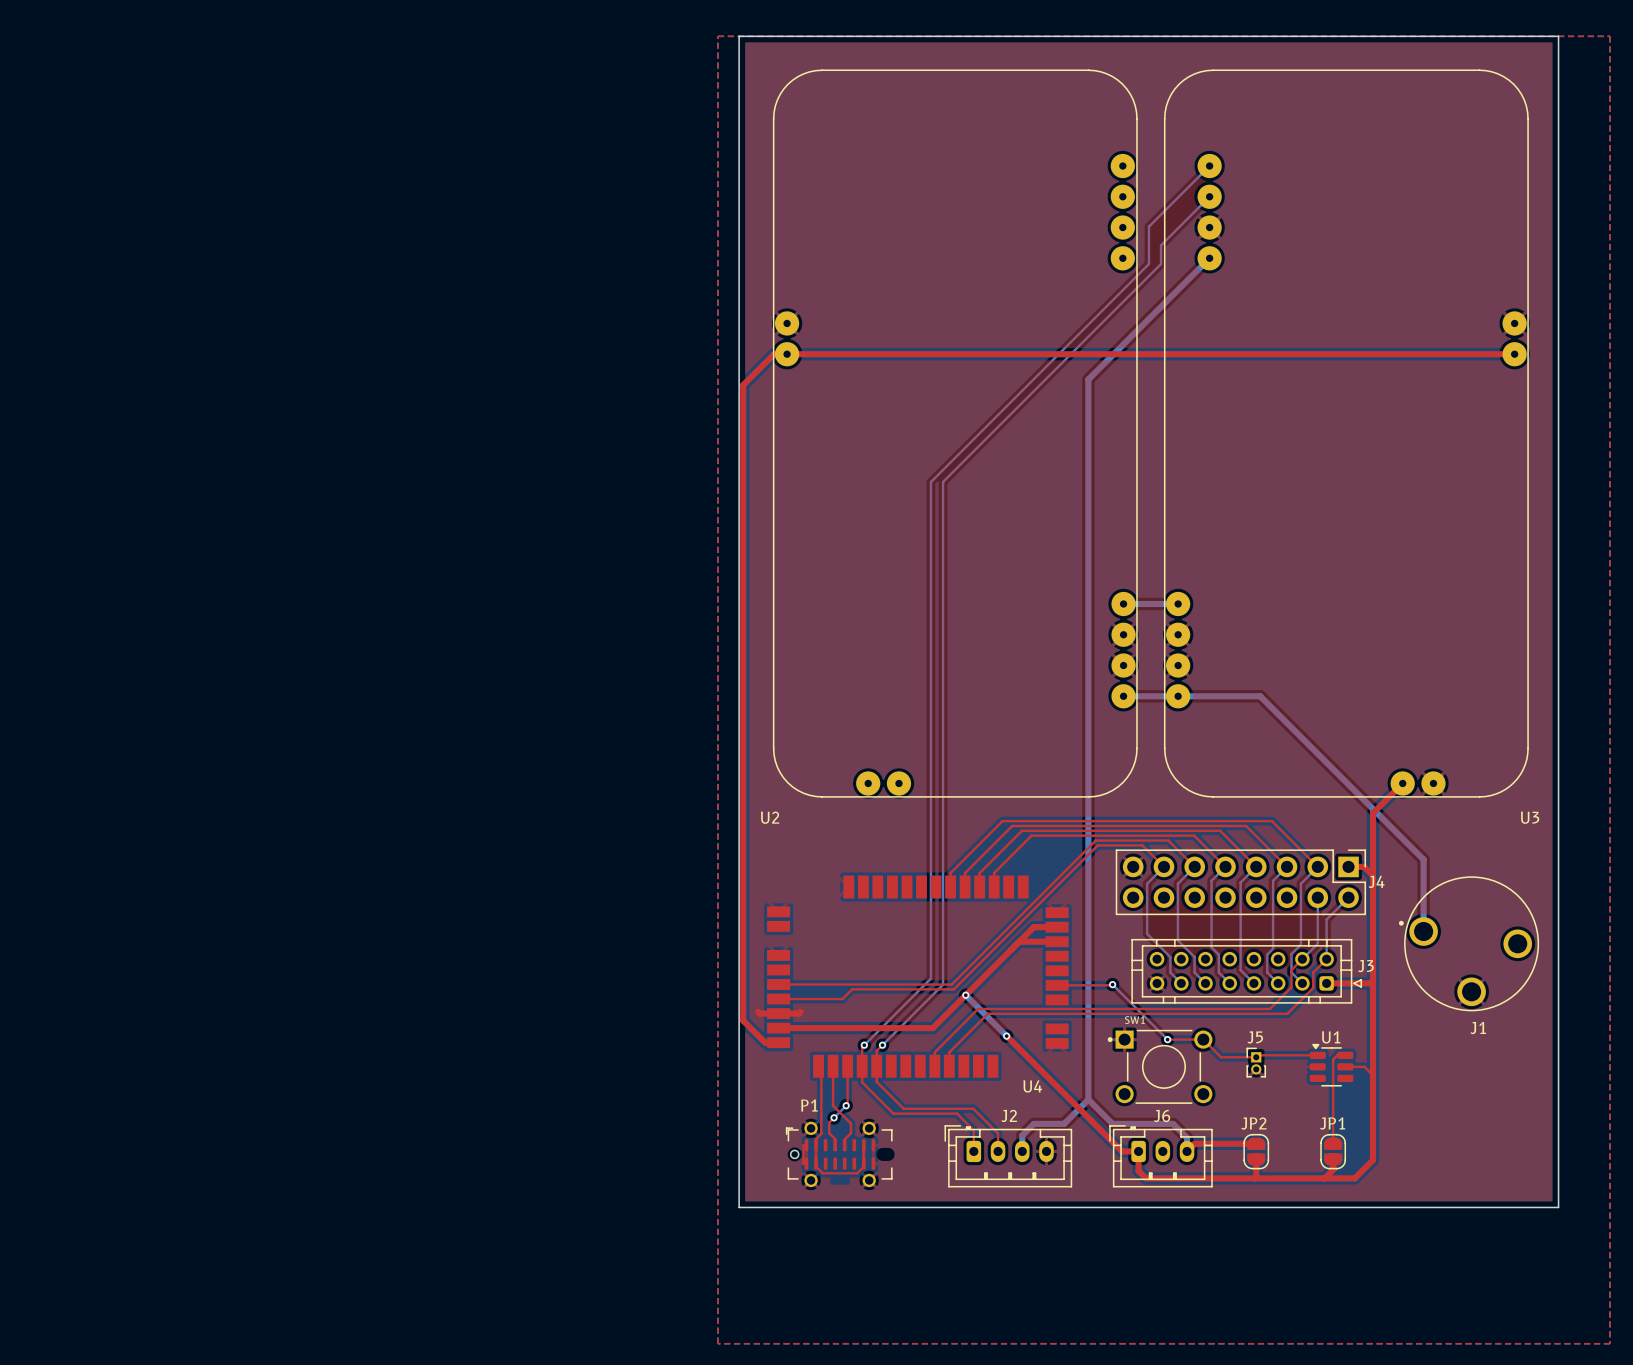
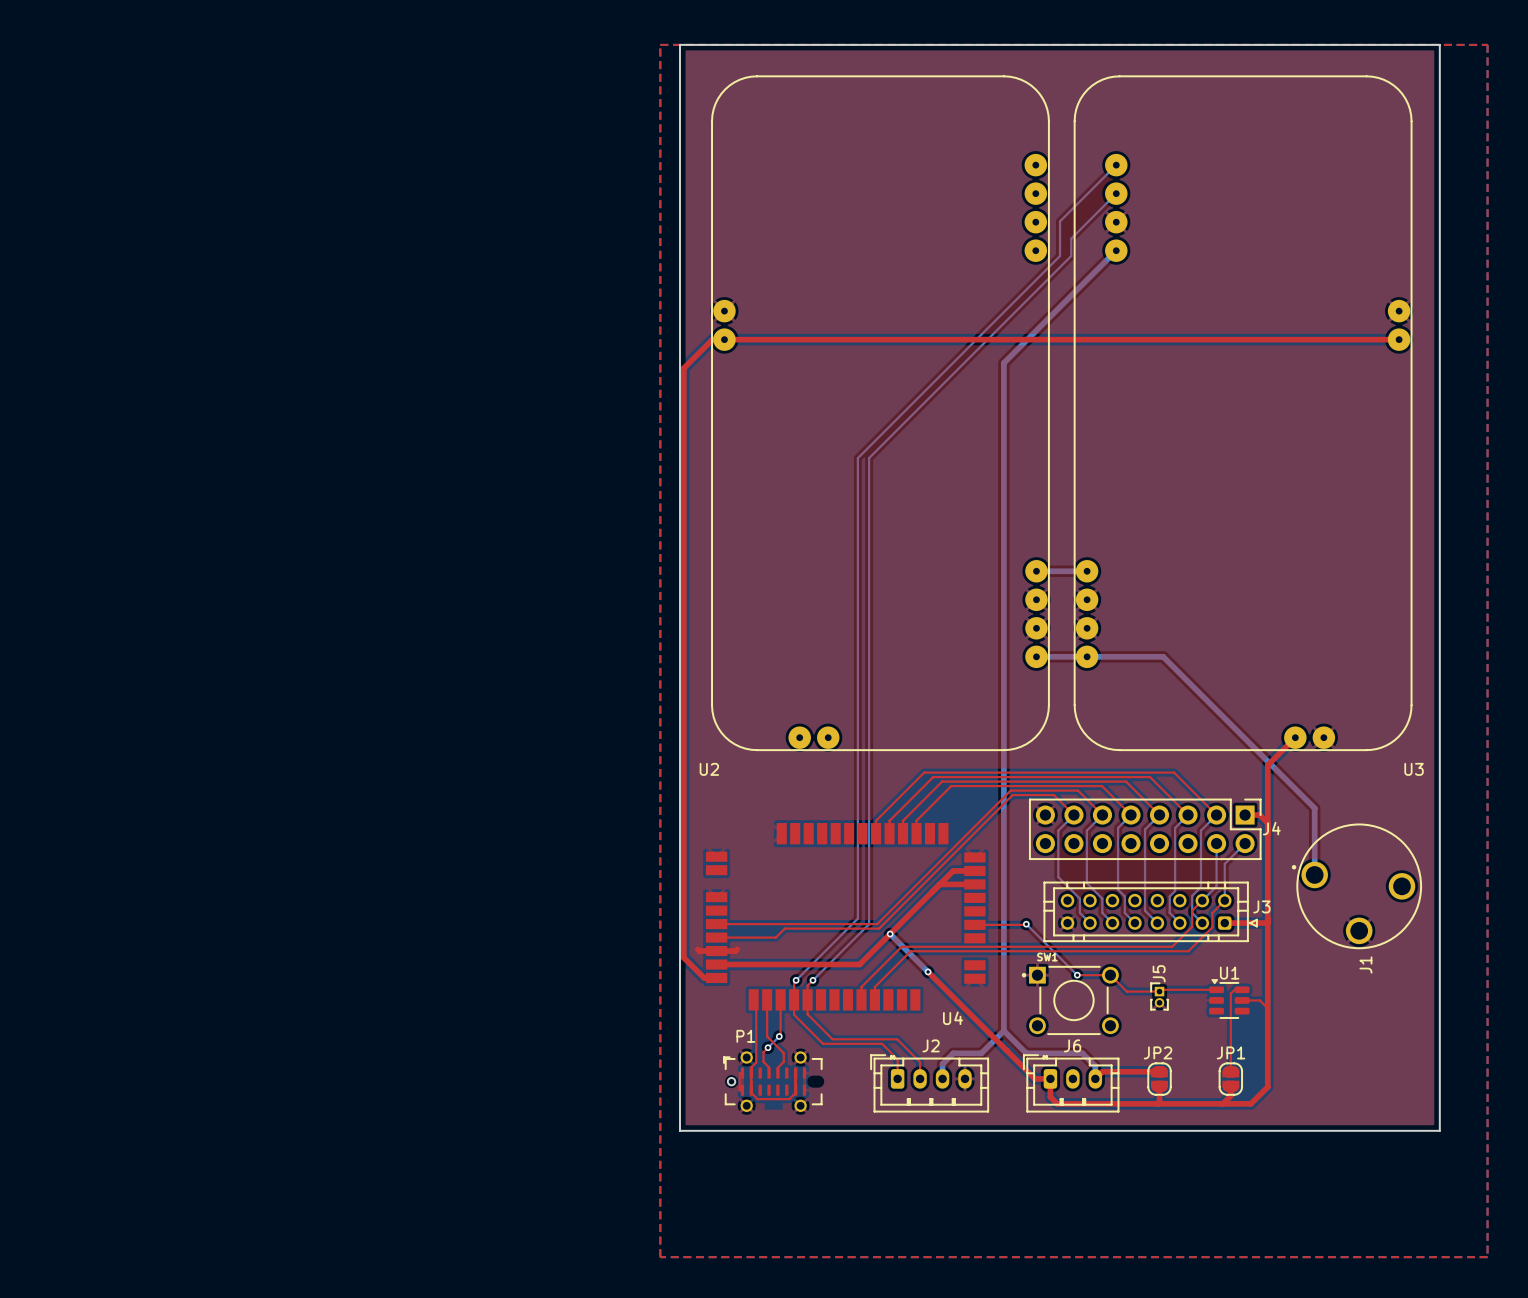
J1 name rotation: 0° (1478, 1028) -> 90° counterclockwise (1365, 965)
J5 name rotation: 0° (1255, 1037) -> 90° counterclockwise (1159, 973)

